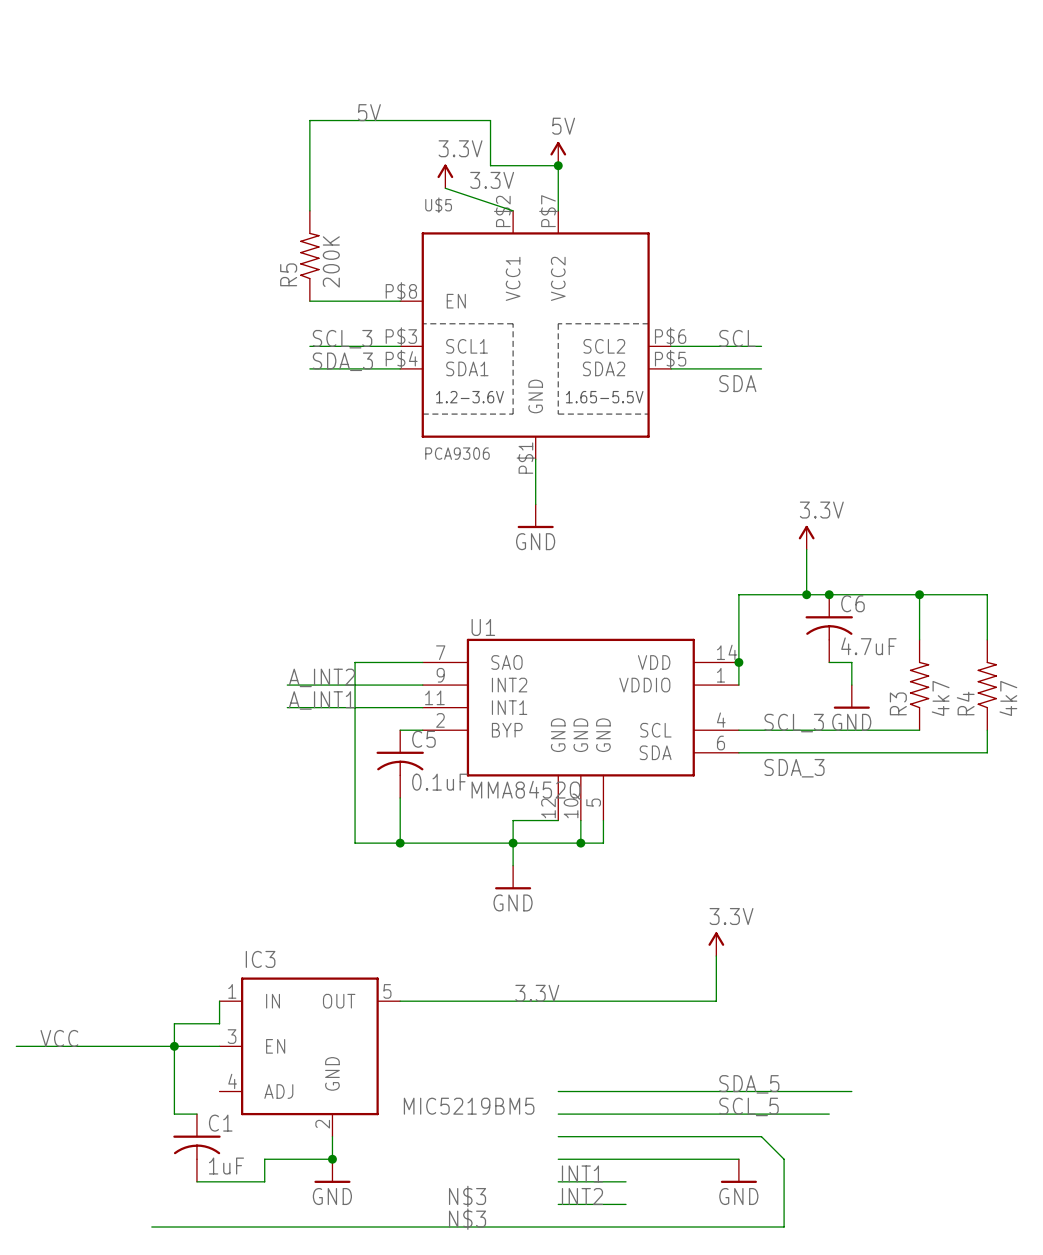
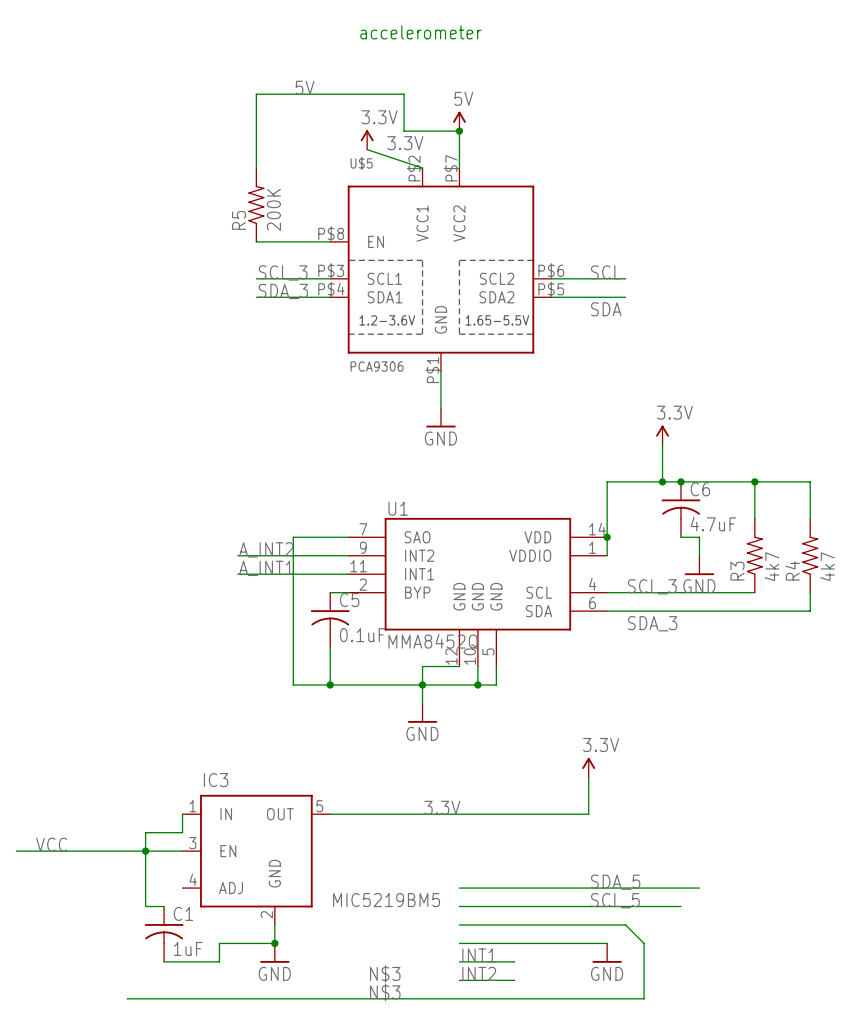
text: none -> accelerometer (420, 32)

